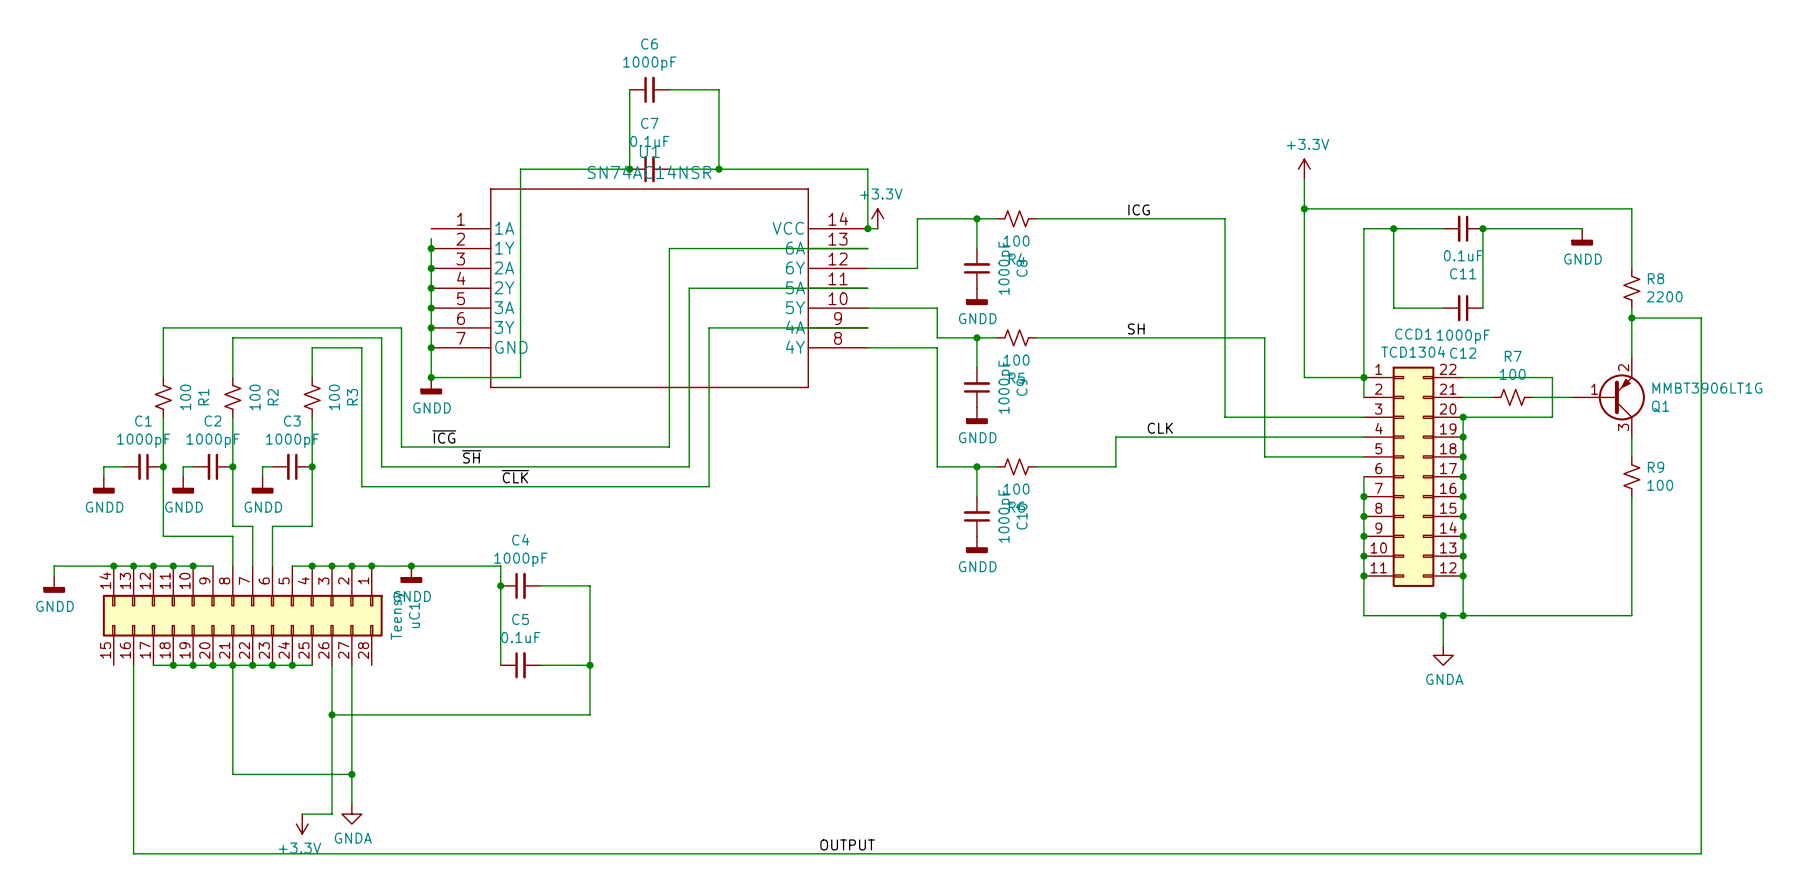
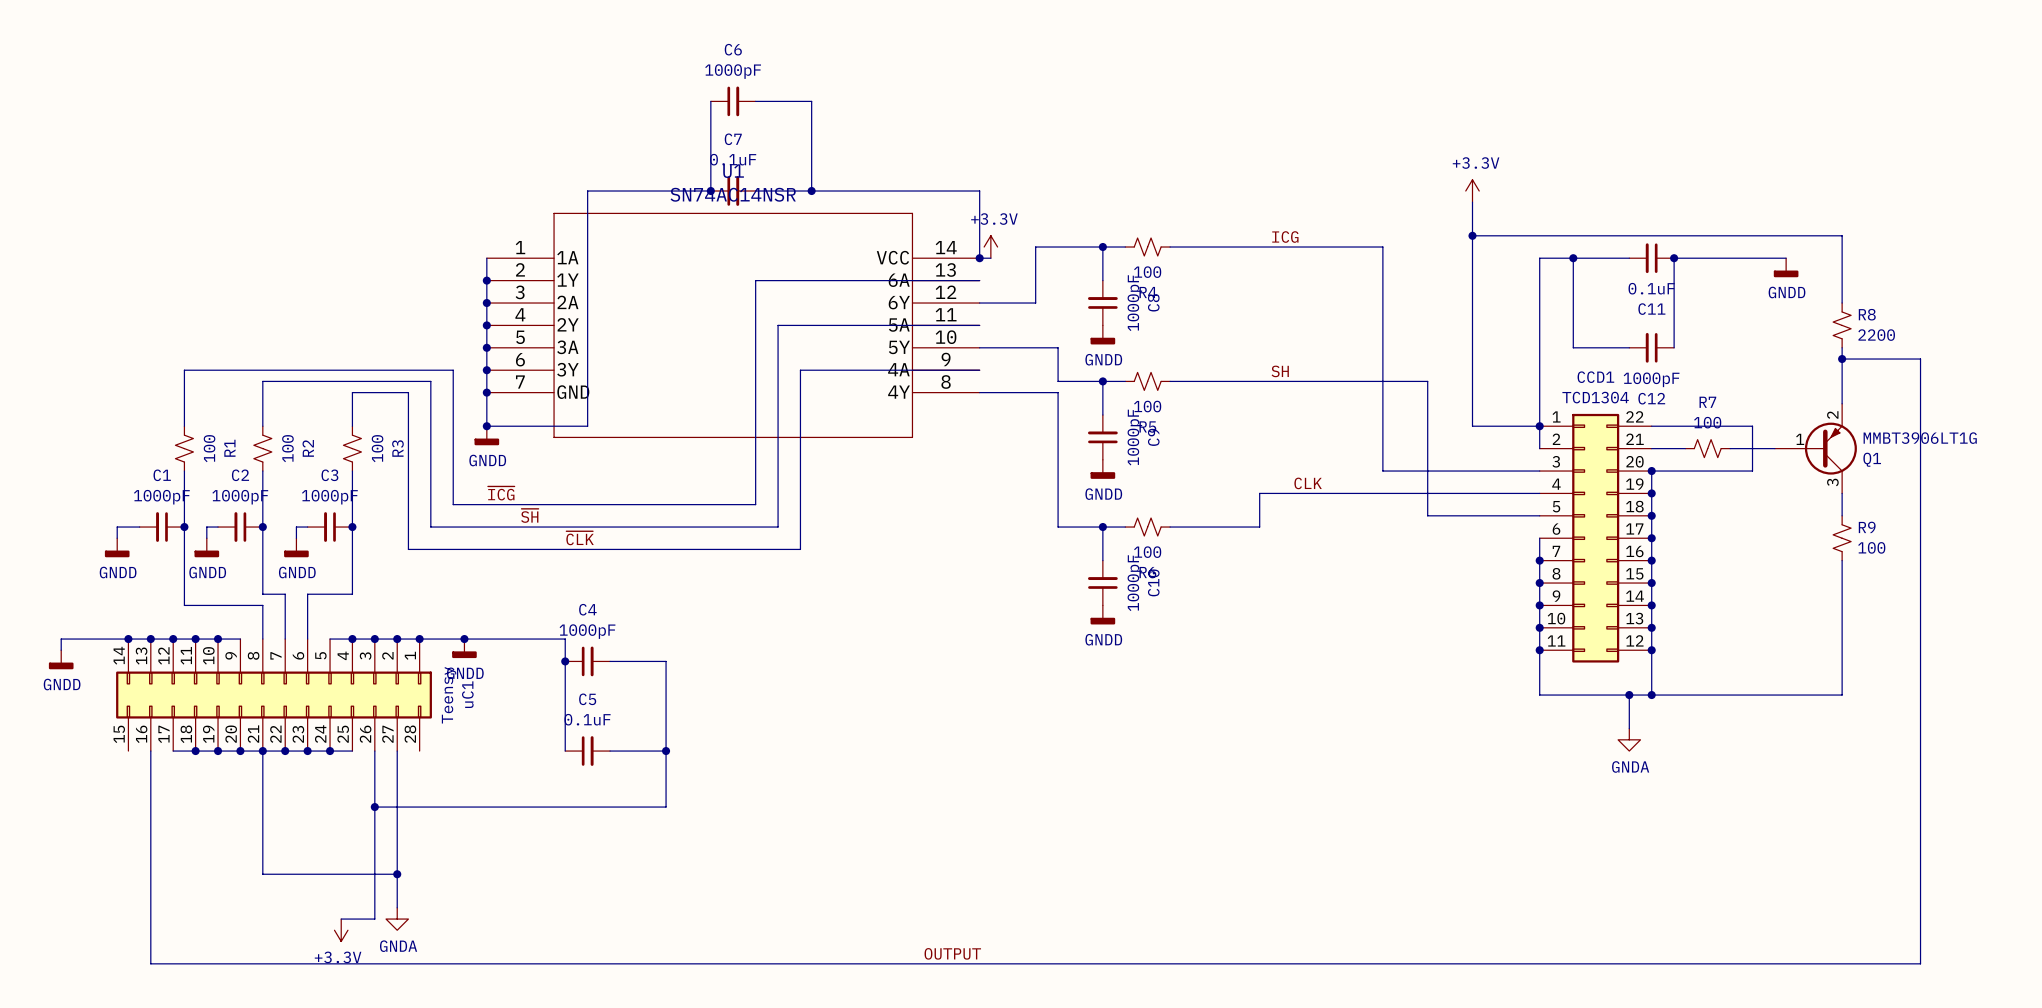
wire: none -> (486, 258) (486, 269)

